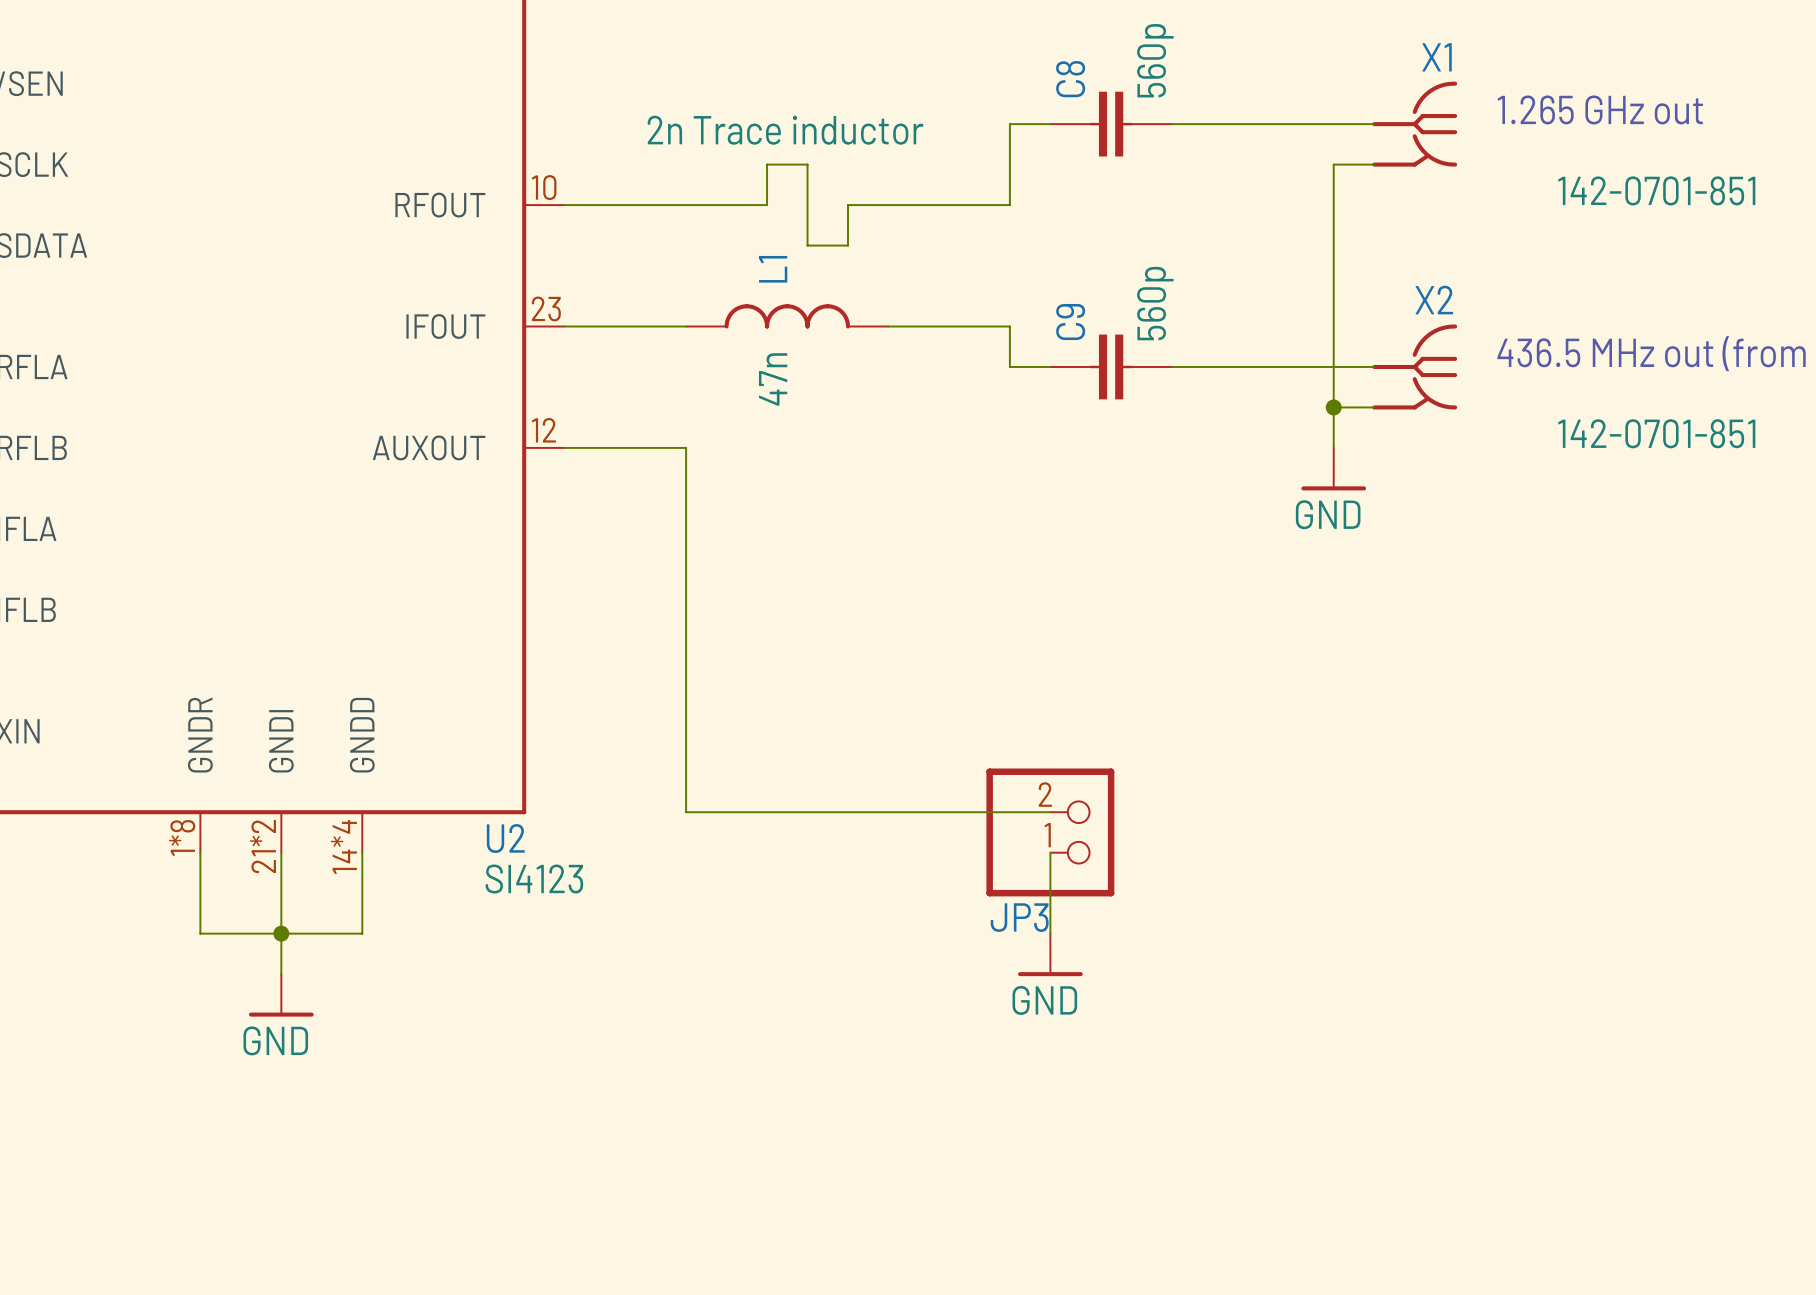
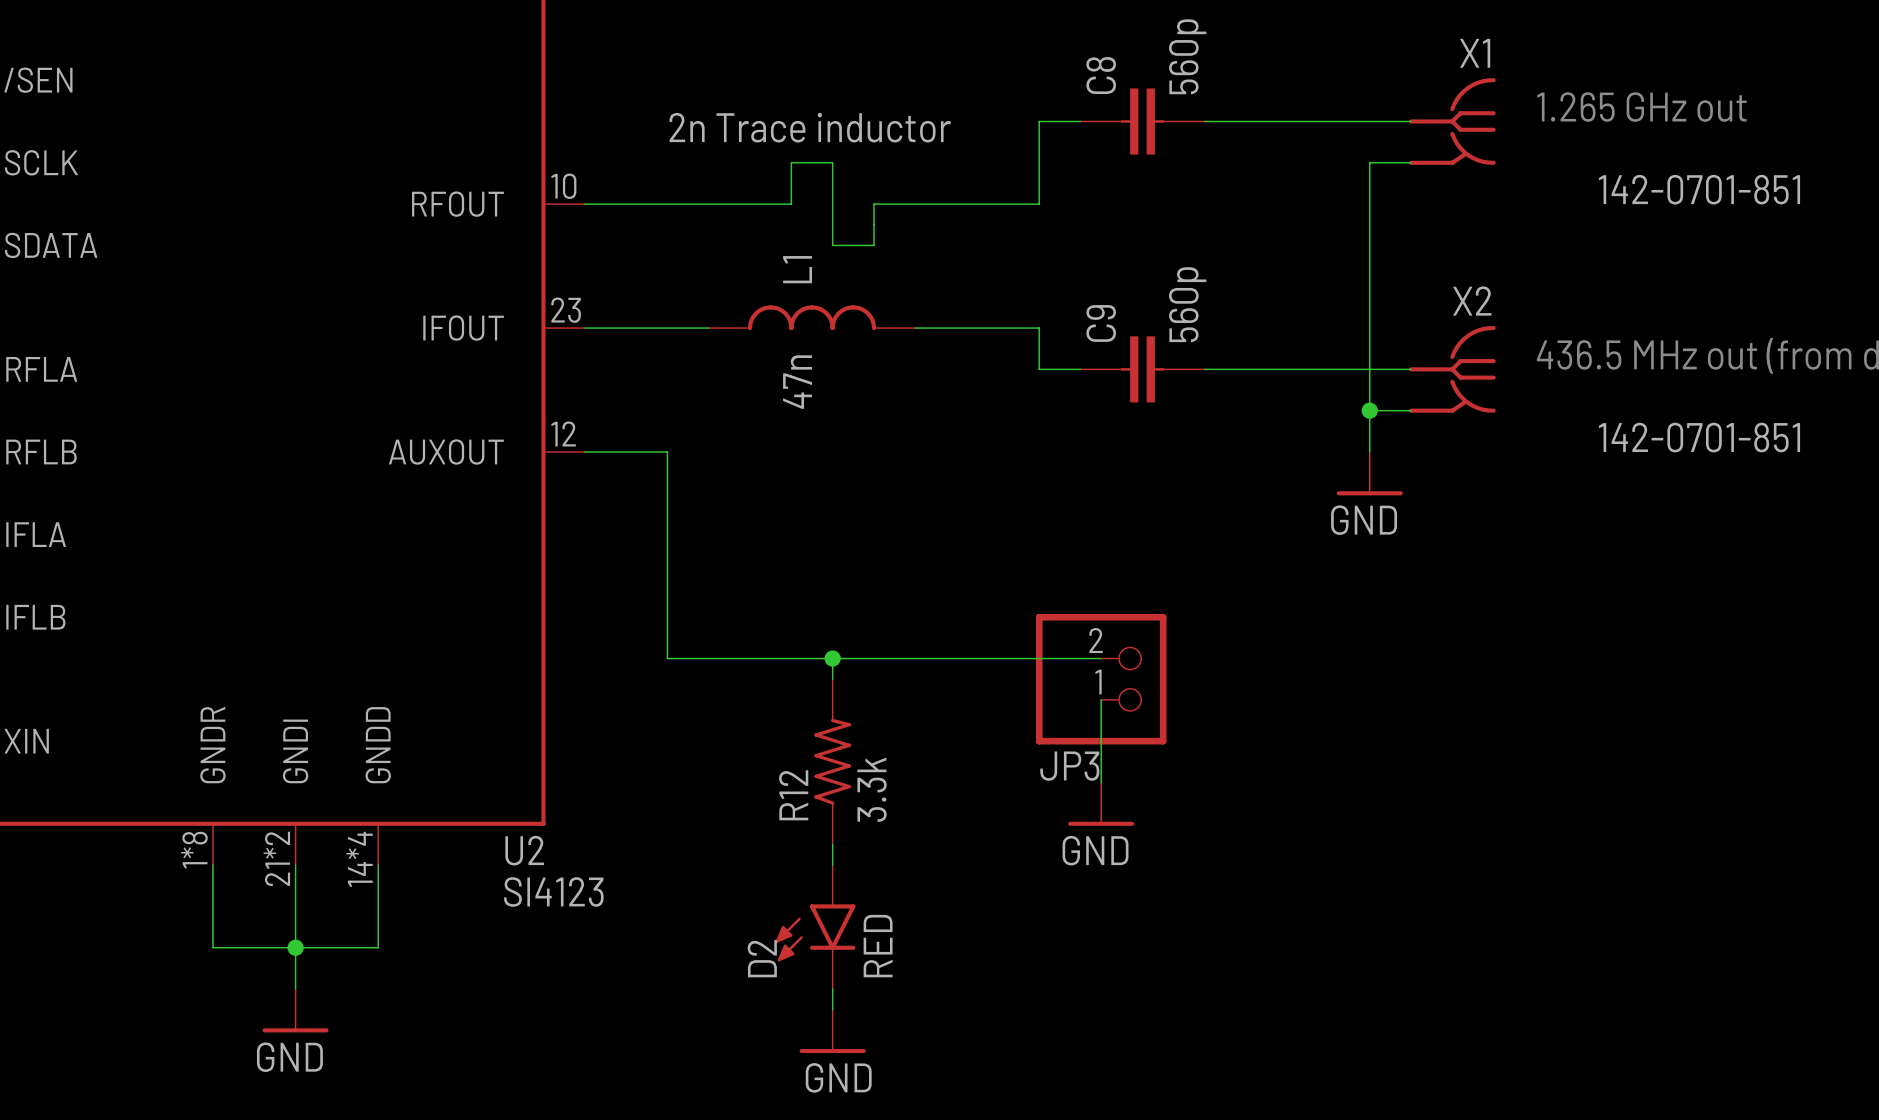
wire: (645, 447) (686, 447) (686, 812) (1050, 812) -> (667, 451) (667, 658) (1101, 658)
wire: none -> (832, 658) (832, 679)
junction: none -> (832, 658)
R12: none -> 3.3k (832, 761)
power symbol: none -> GND (1101, 804)
wire: none -> (832, 844) (832, 865)
JP3 position: (1050, 832) -> (1101, 679)
wire: (1050, 852) (1050, 933) -> (1101, 699) (1101, 782)
D2: none -> RED (815, 927)
power symbol: GND (1050, 954) -> none
wire: none -> (832, 989) (832, 1009)
power symbol: none -> GND (832, 1031)

